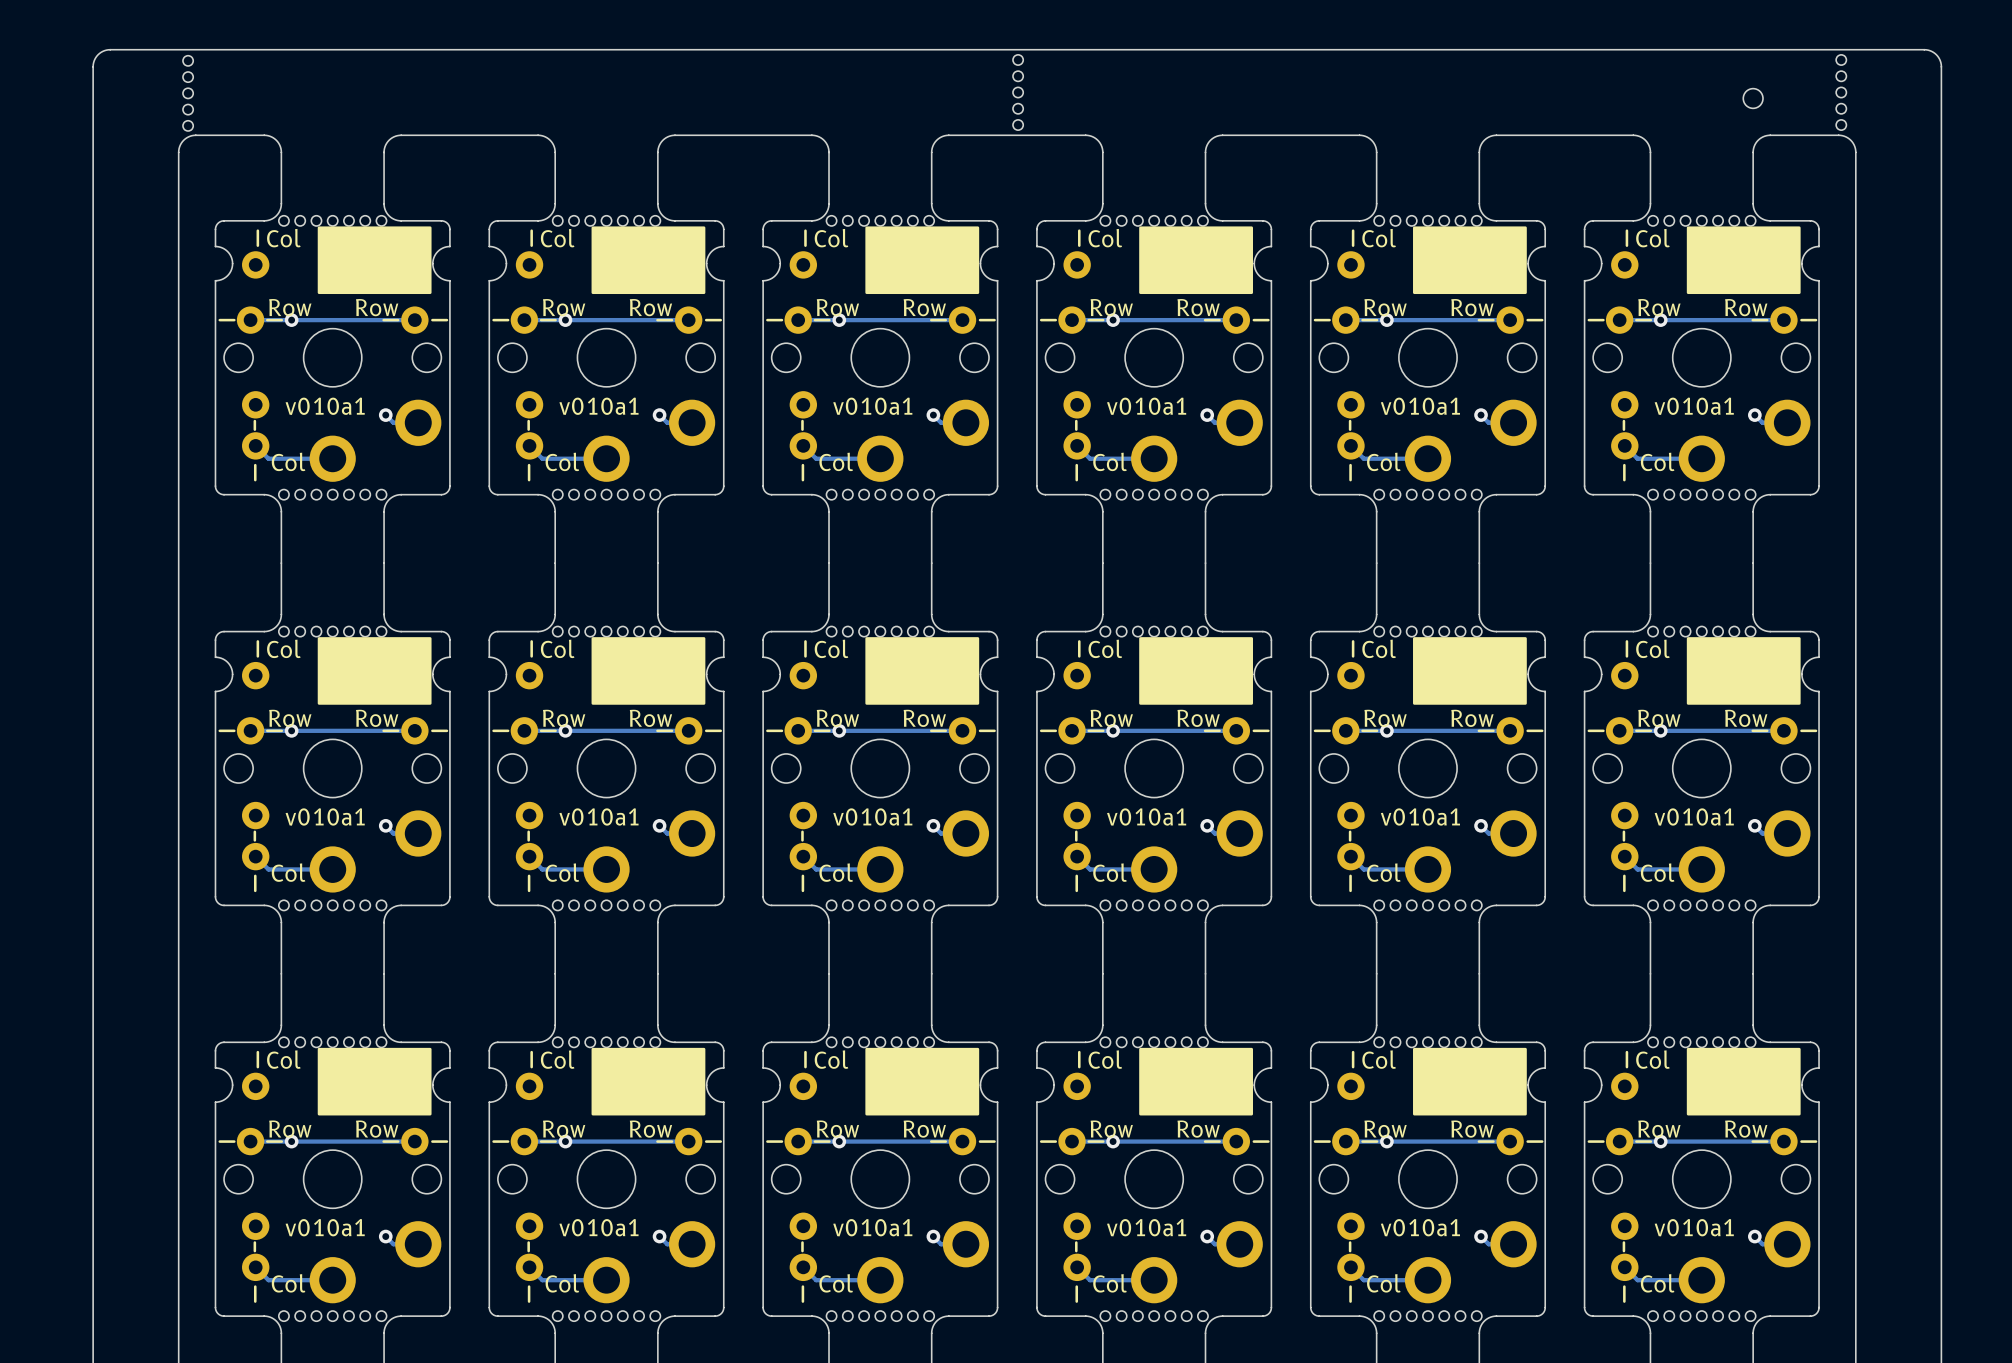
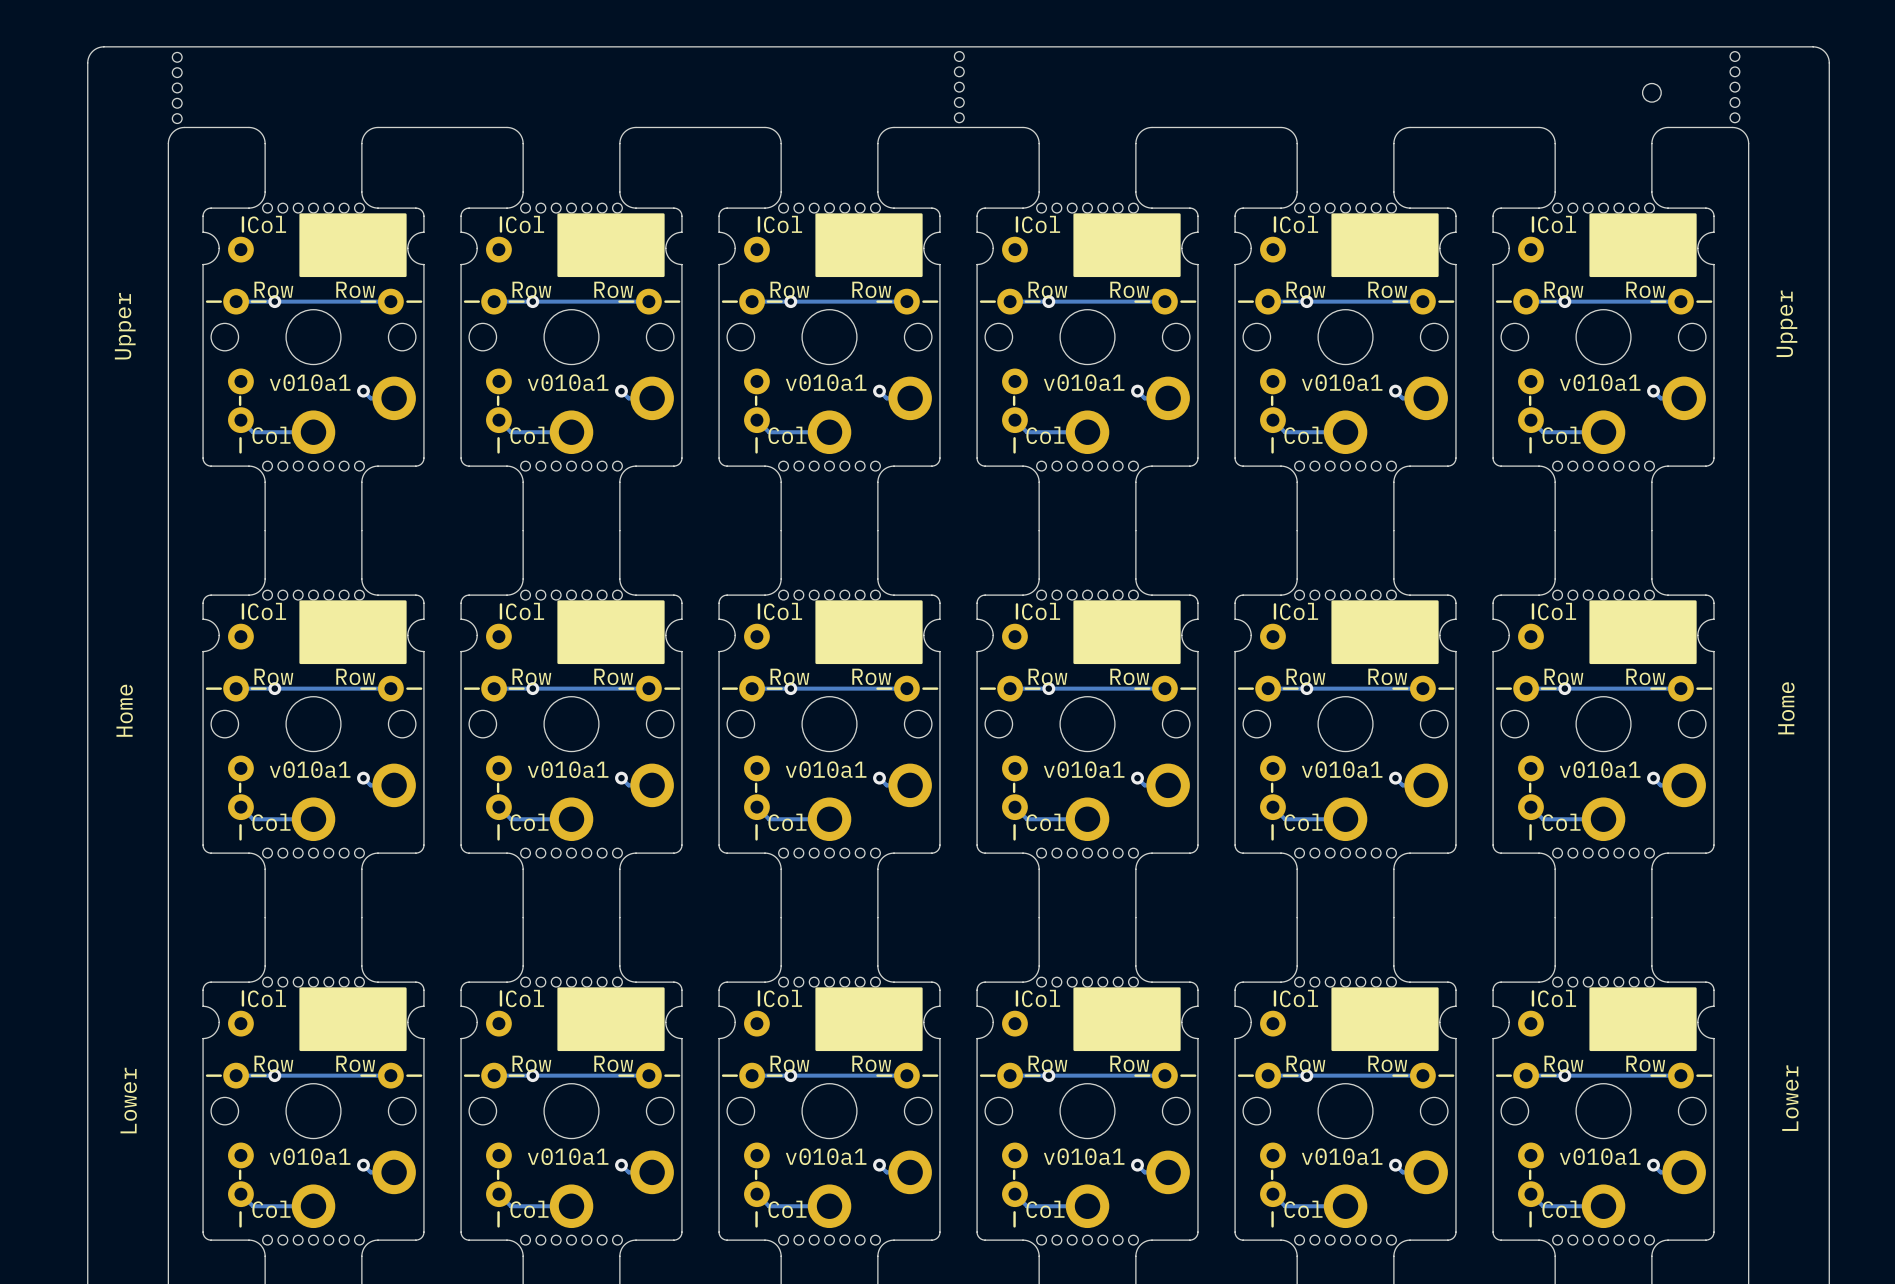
text: none -> Upper (1786, 323)
text: none -> Upper (125, 326)
text: none -> Home (1786, 708)
text: none -> Home (124, 710)
text: none -> Lower (1790, 1098)
text: none -> Lower (128, 1100)

